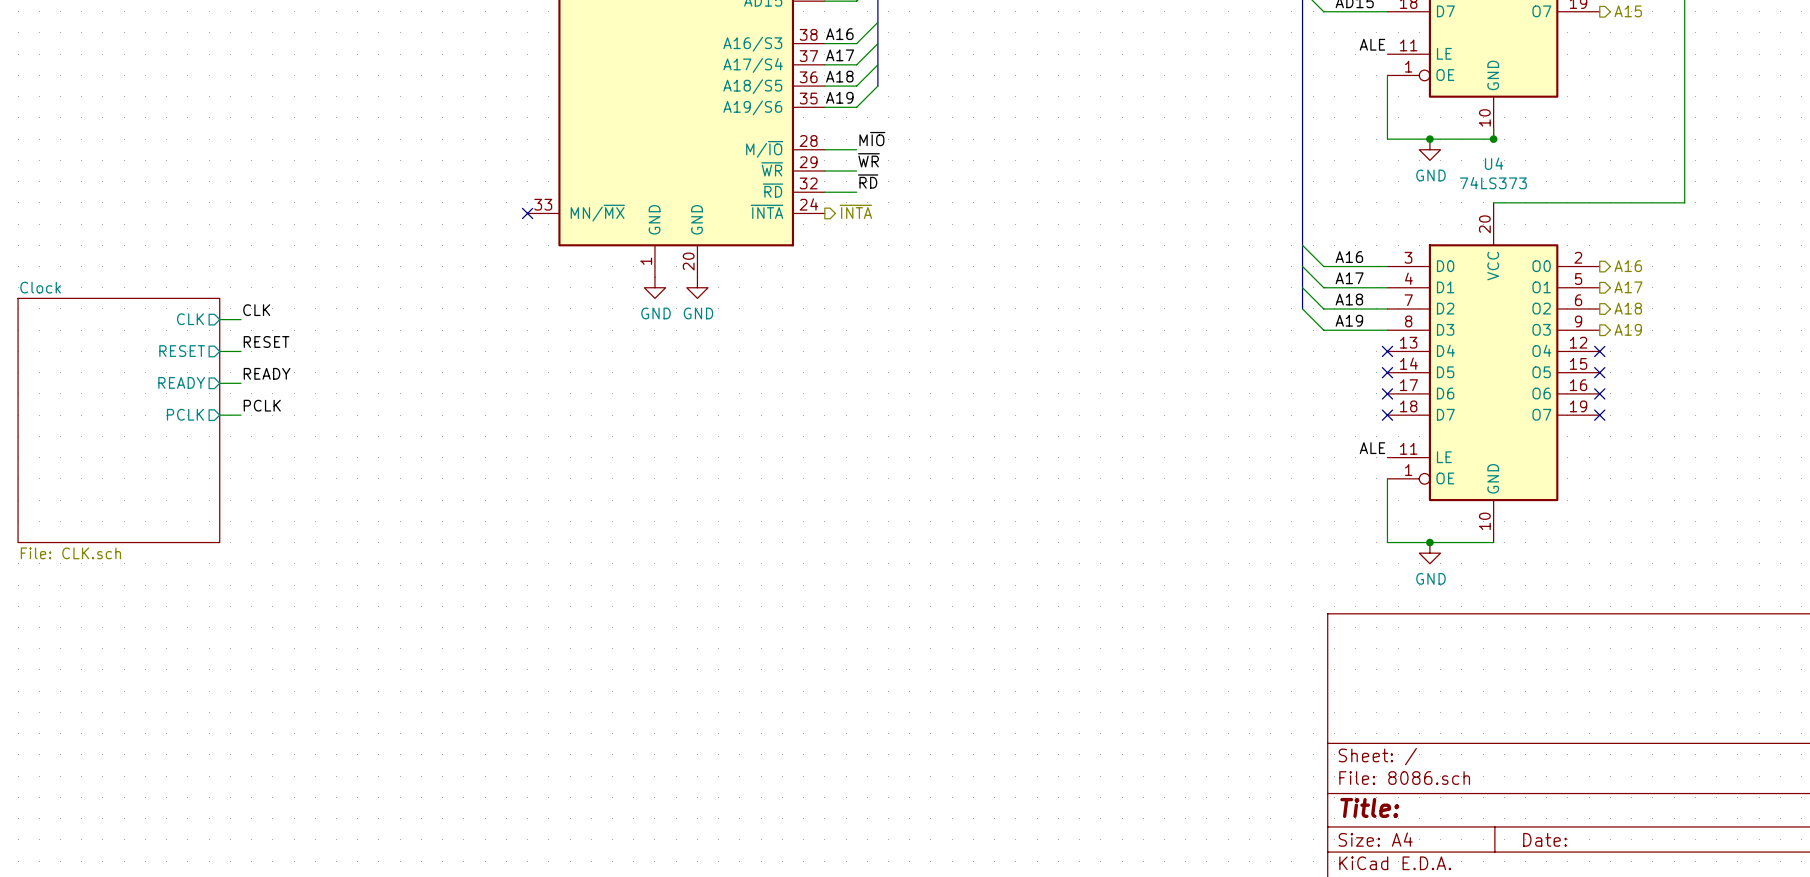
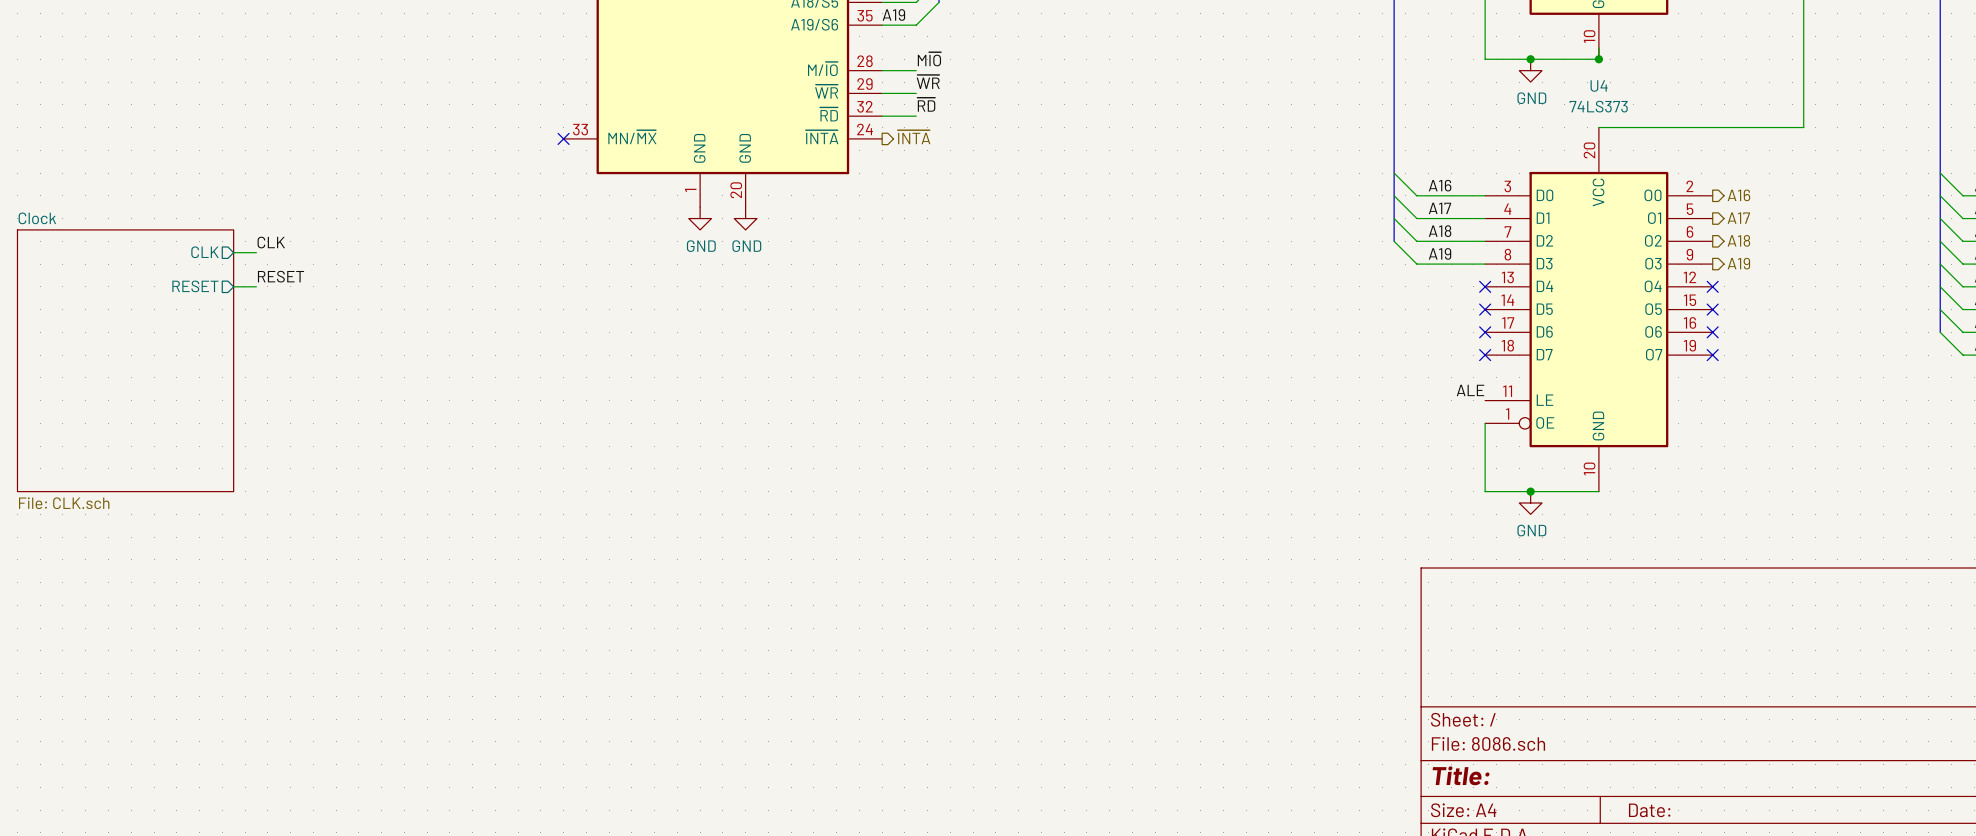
label: READY (267, 373) -> none
sheet pin: READY (181, 382) -> none
wire: (219, 383) (240, 383) -> none
label: PCLK (262, 405) -> none
sheet pin: PCLK (185, 414) -> none
wire: (219, 415) (240, 415) -> none

